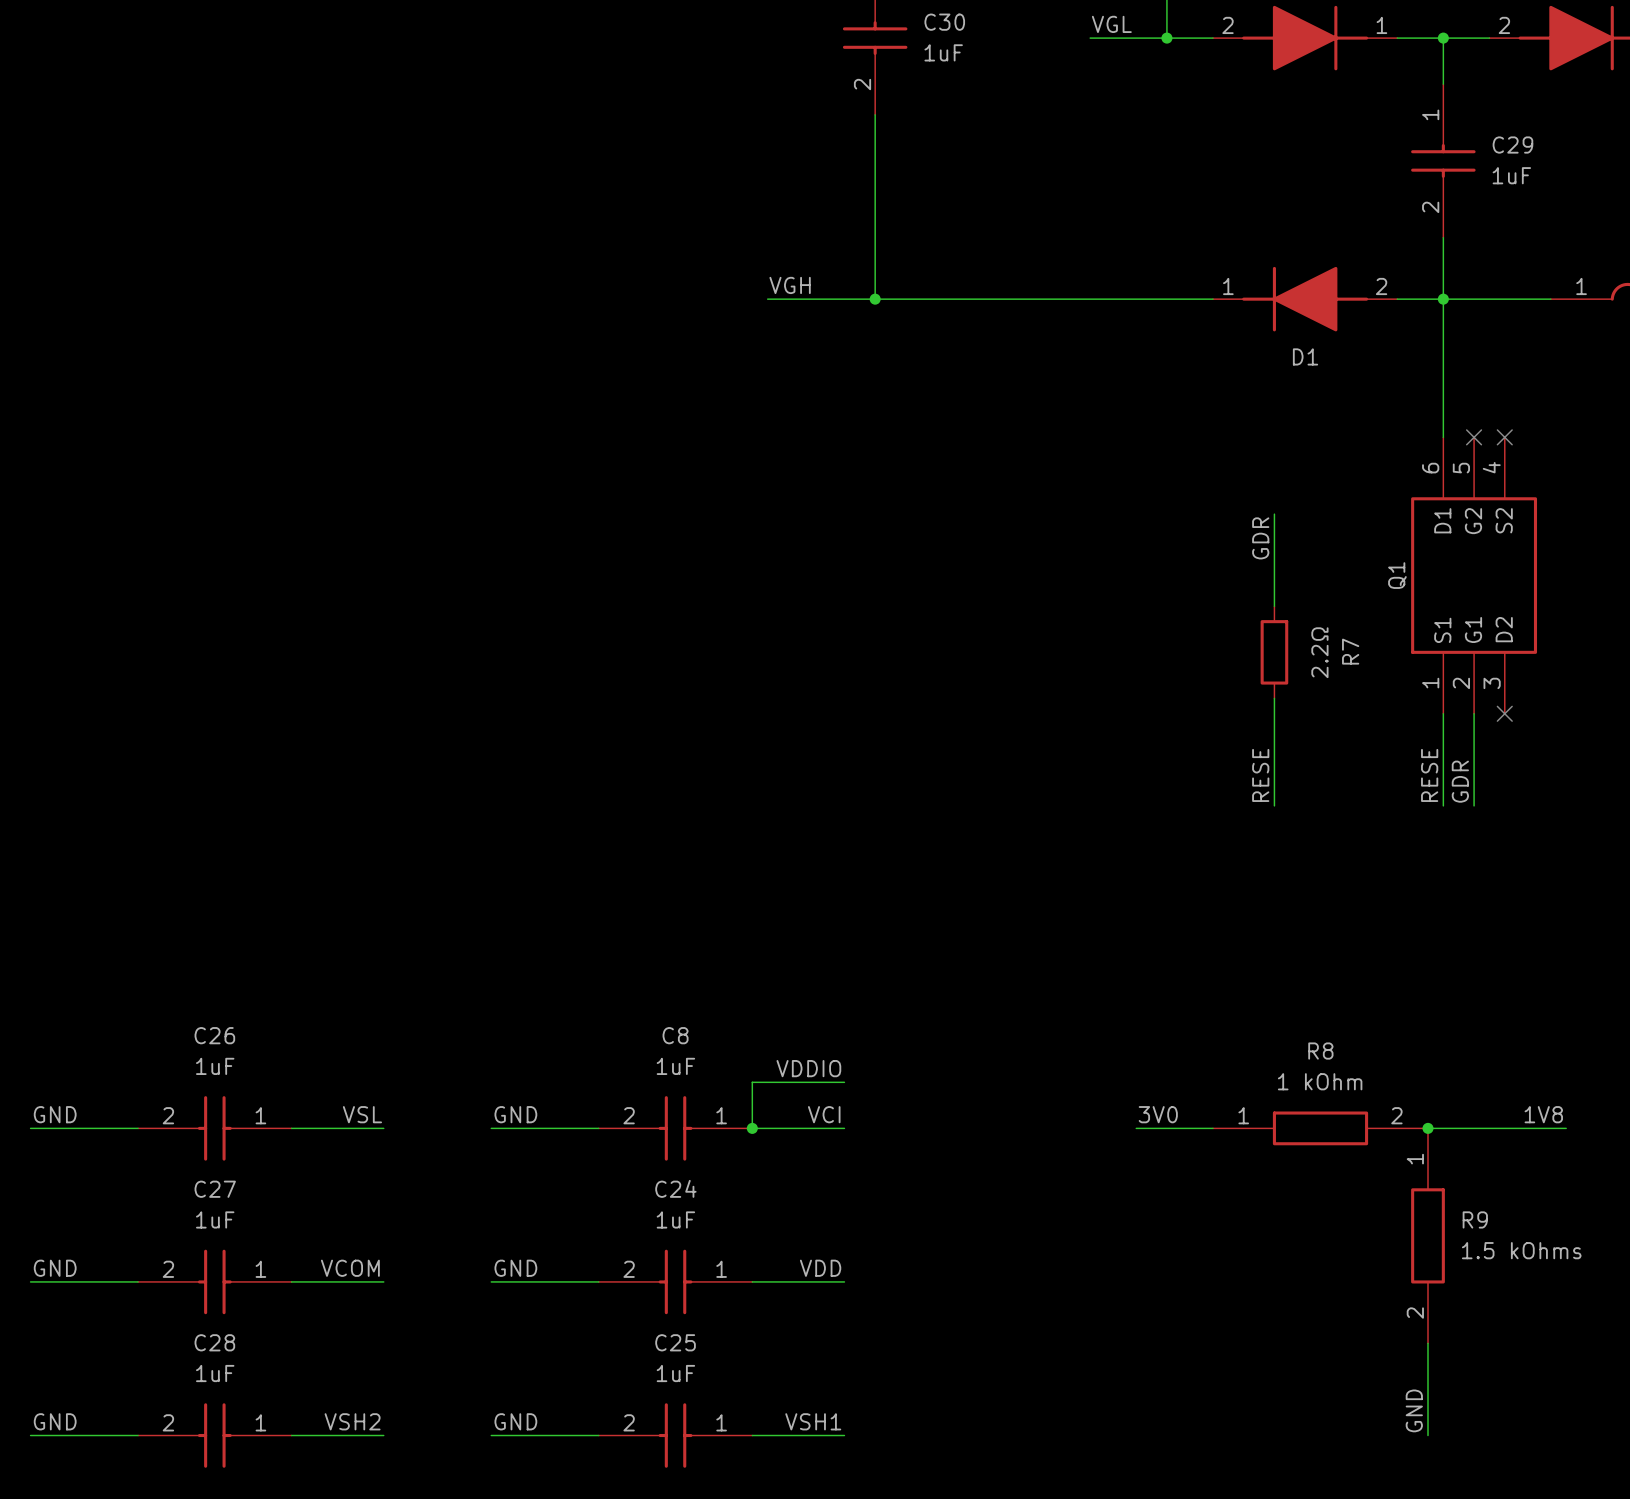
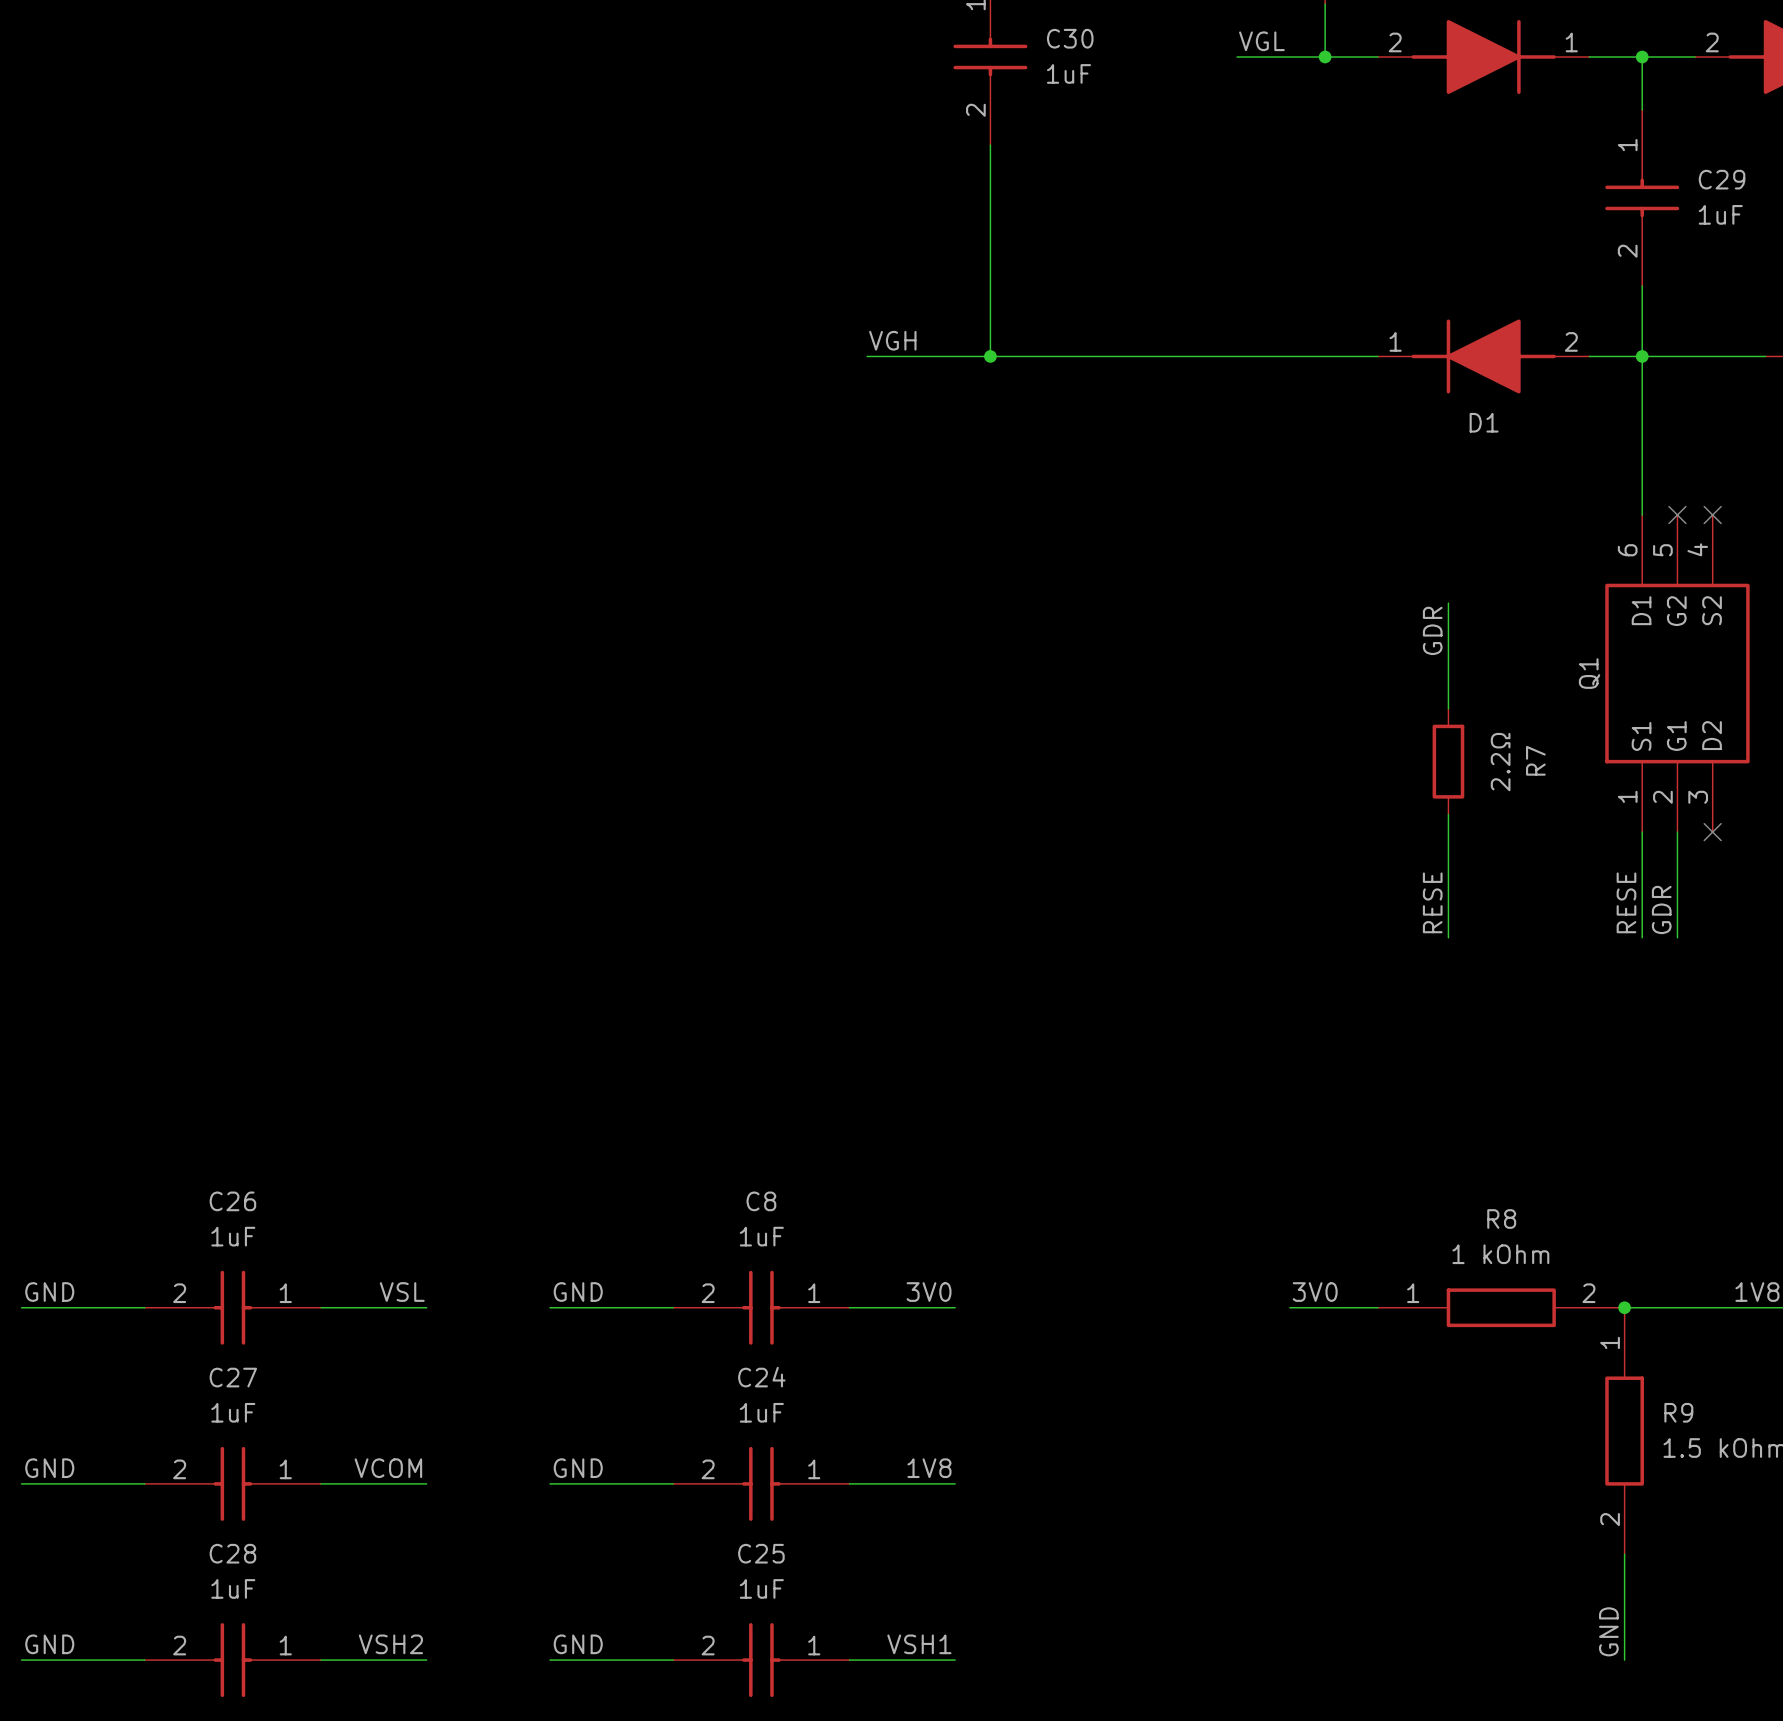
label: VDDIO (808, 1068) -> none
wire: (844, 1082) (752, 1082) (752, 1128) -> none
label: VCI (824, 1114) -> 3V0 (929, 1292)
junction: (752, 1128) -> none
label: VDD (820, 1268) -> 1V8 (929, 1468)

